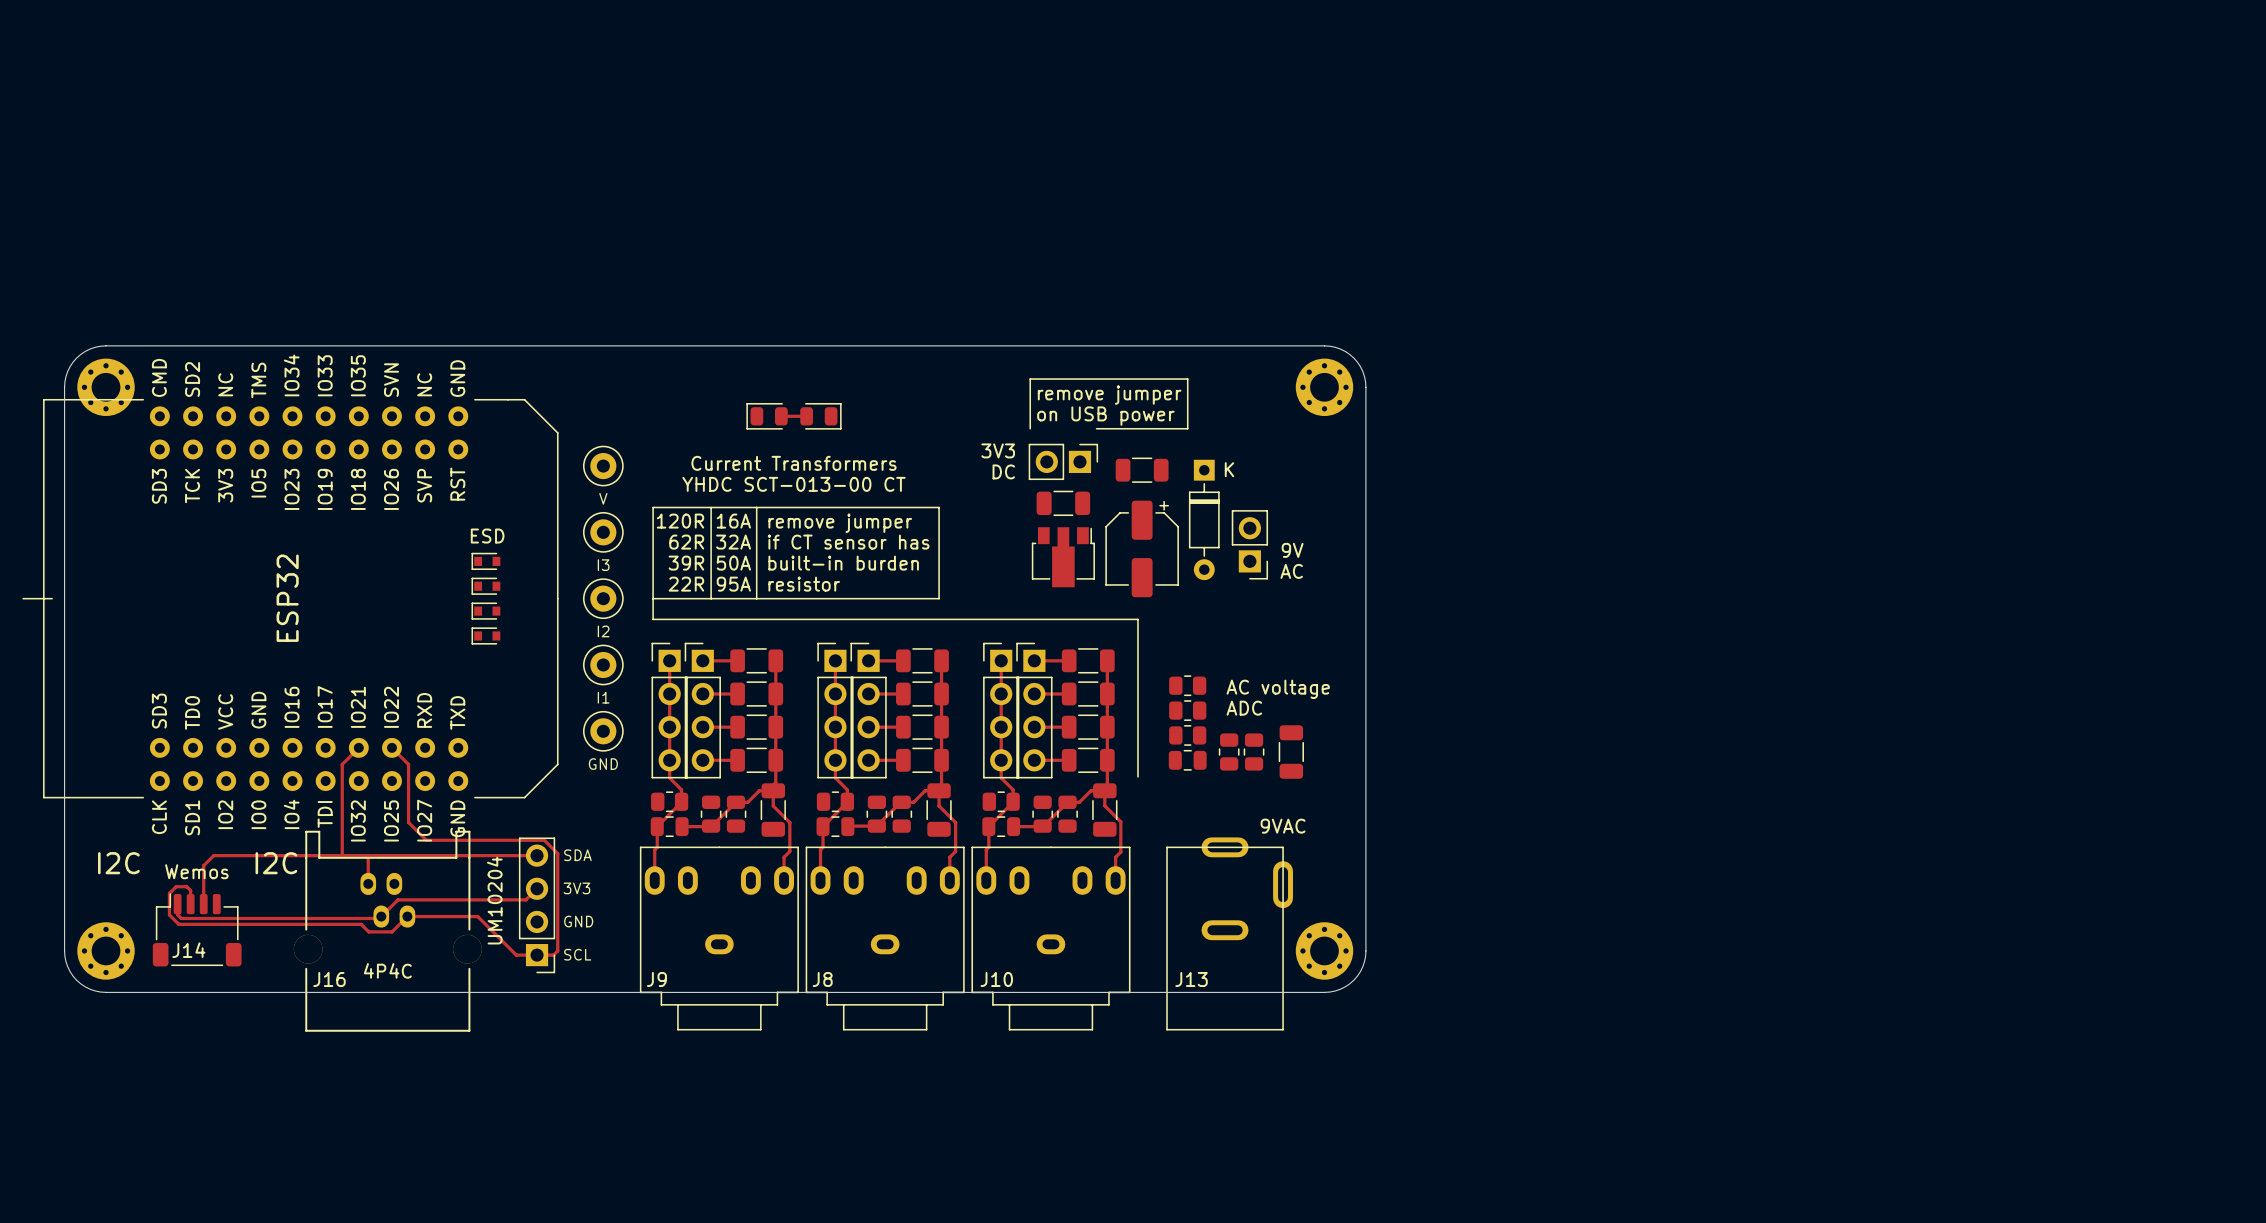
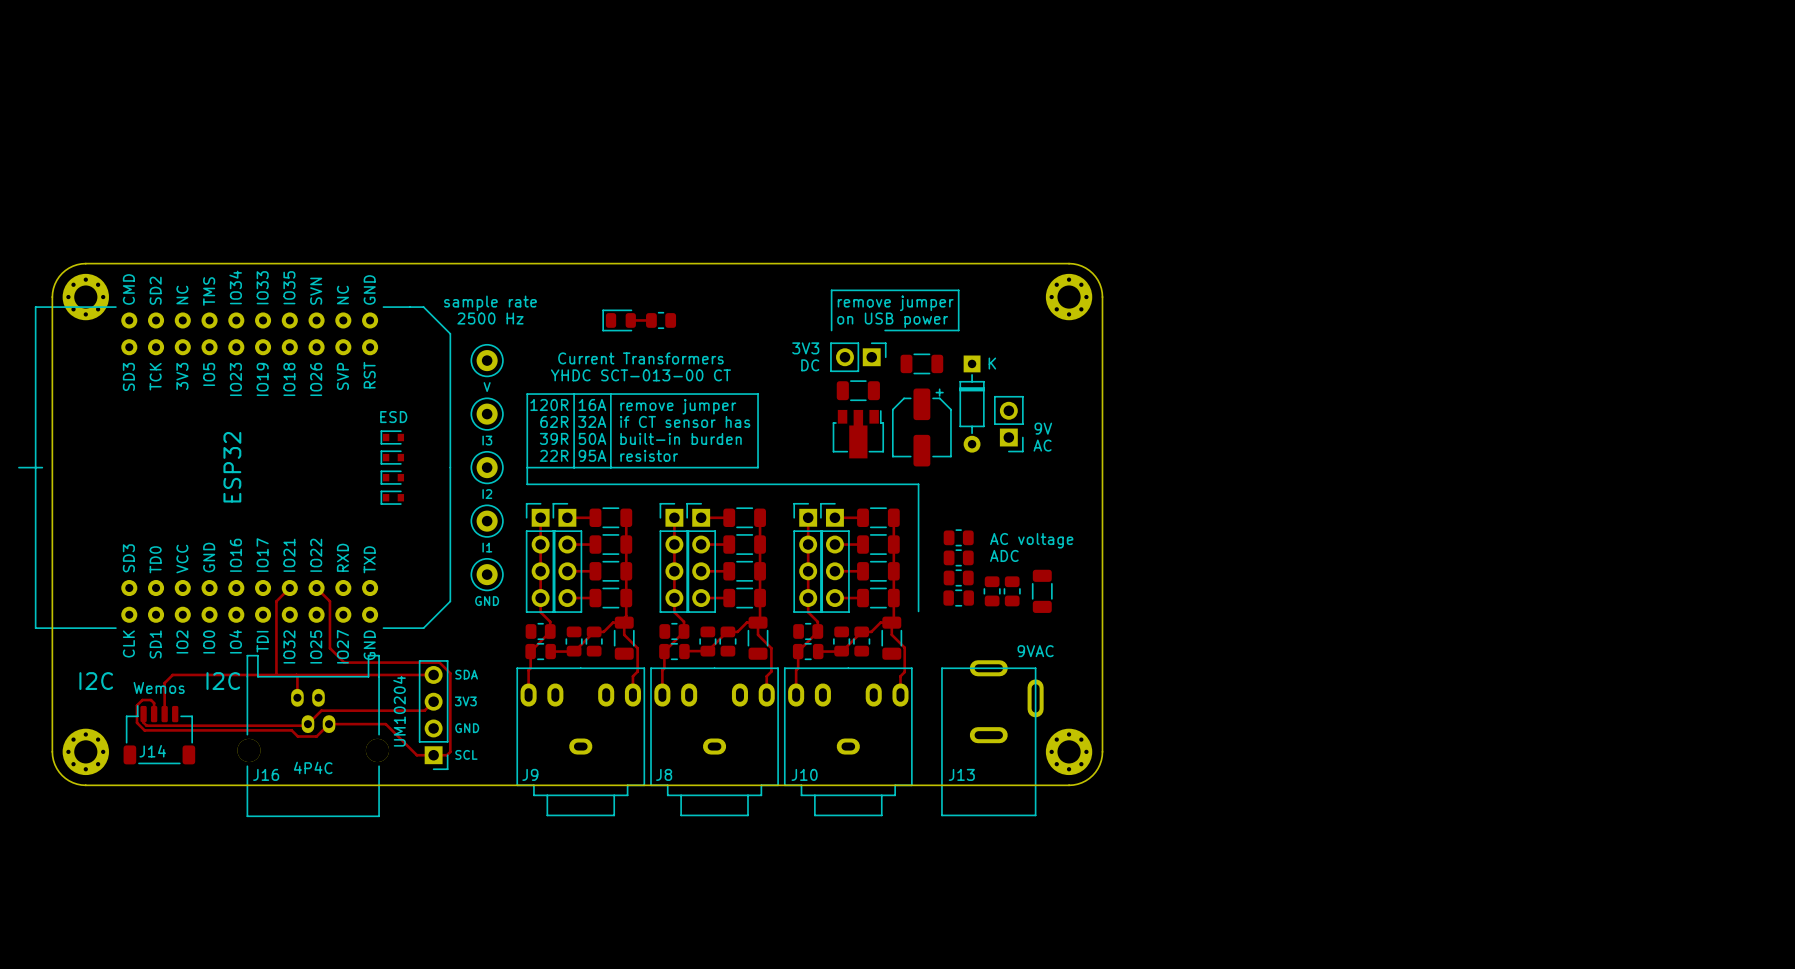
text: none -> sample rate (490, 303)
part footprint: [800, 403, 842, 430] -> [646, 312, 677, 329]
text: none -> 2500 Hz (490, 318)

